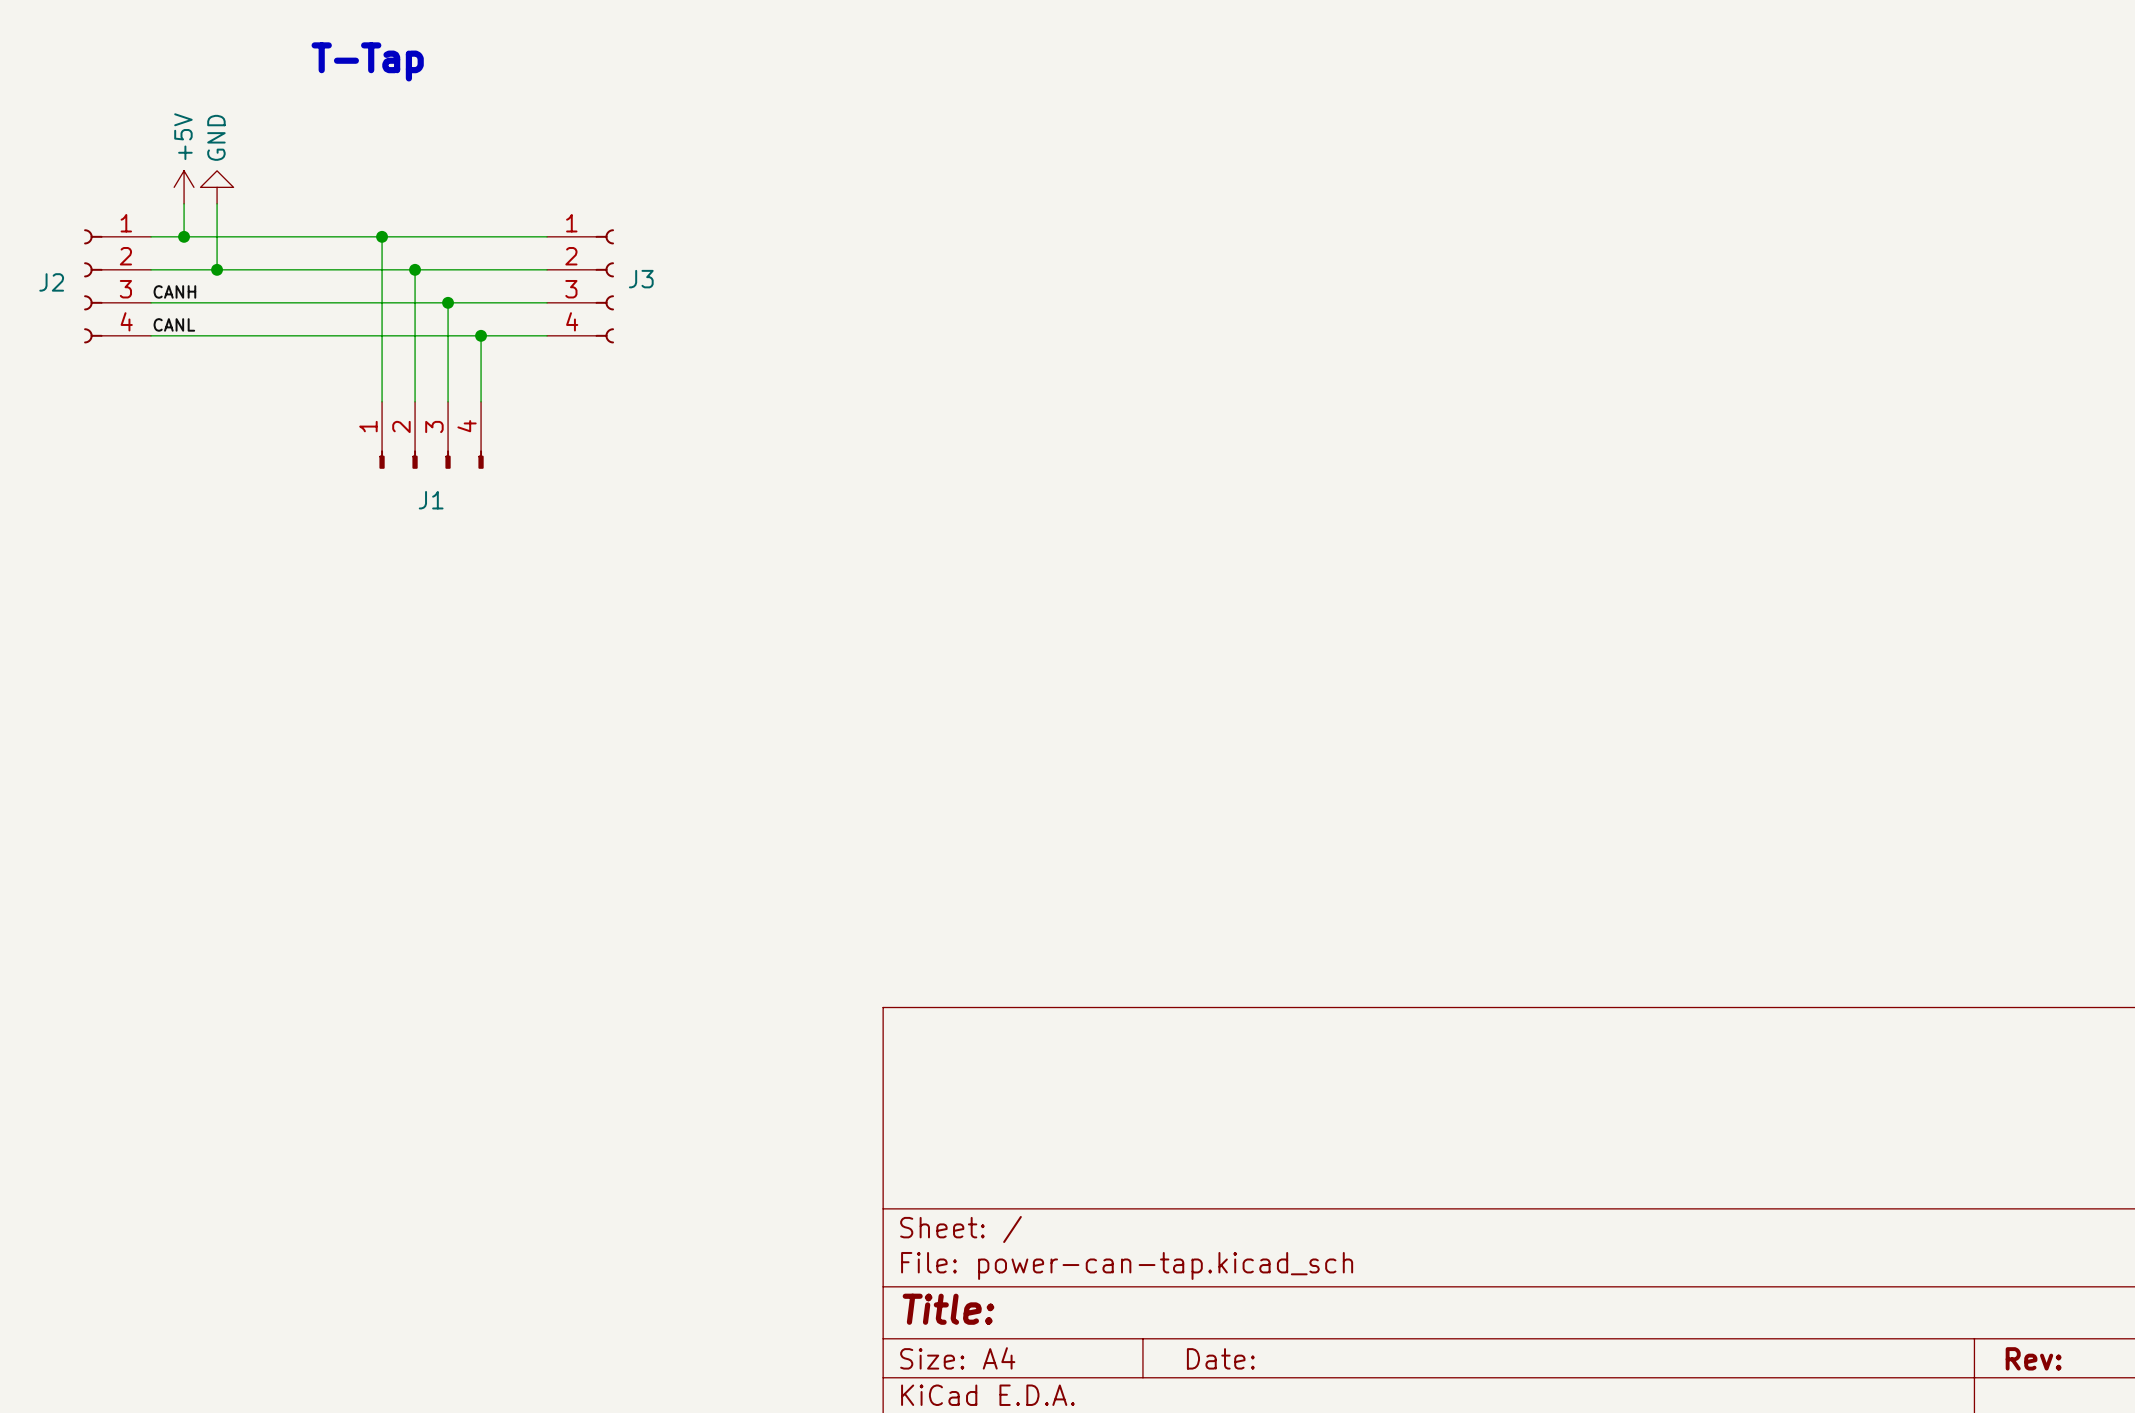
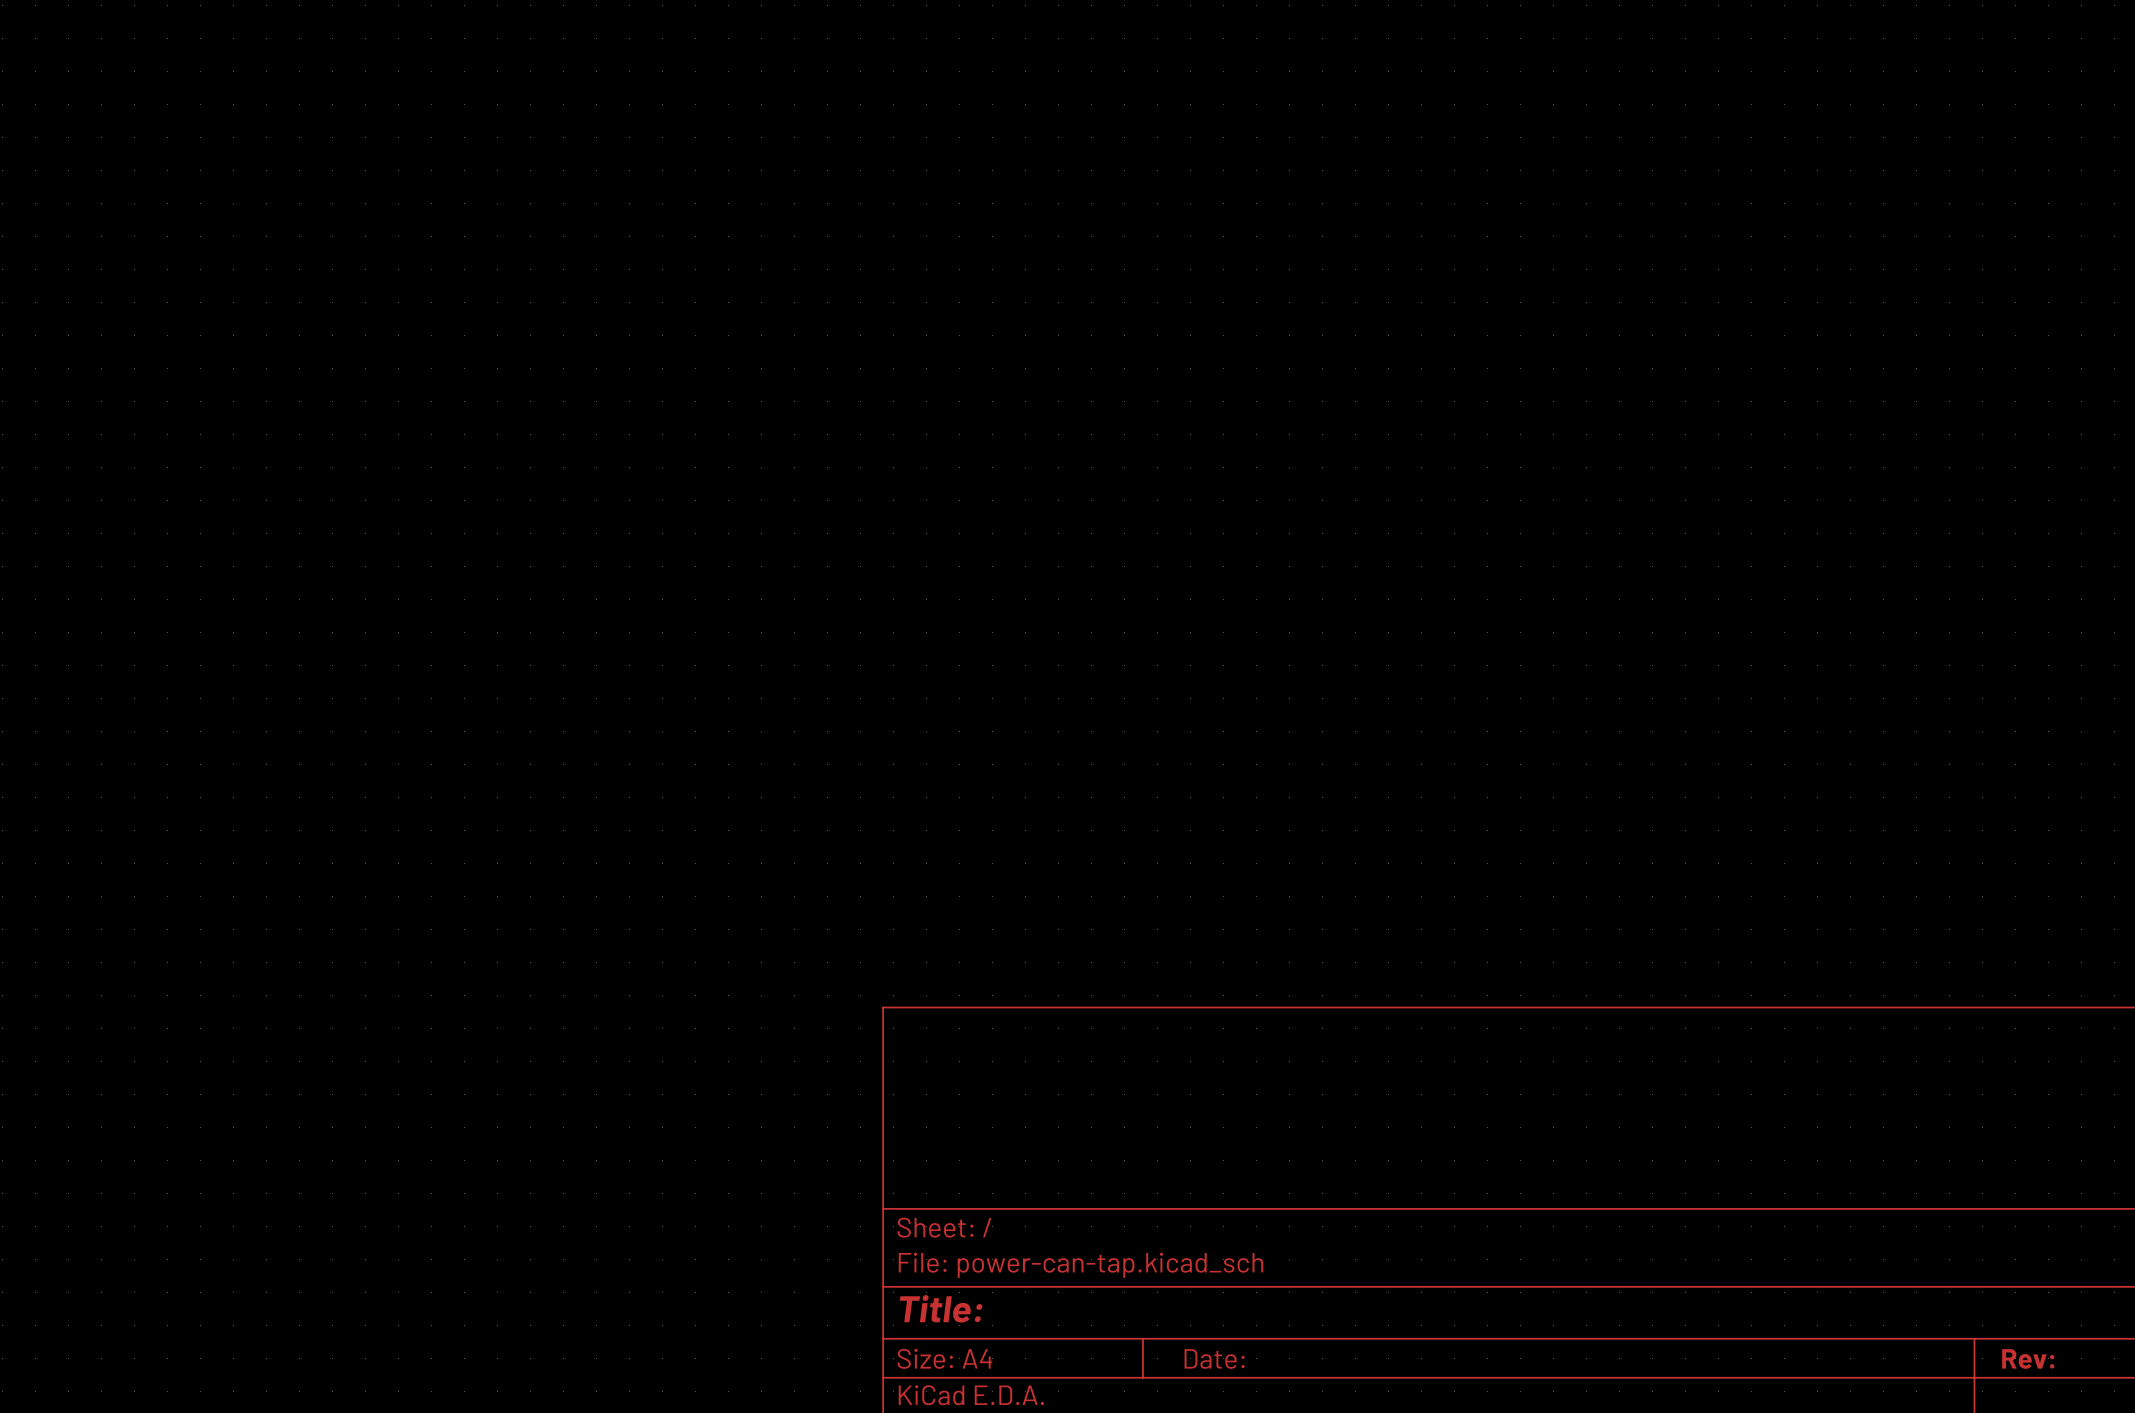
text: T-Tap (367, 61) -> none
power symbol: +5V (184, 187) -> none
power symbol: GND (217, 187) -> none
wire: (184, 203) (184, 236) -> none
wire: (217, 203) (217, 269) -> none
wire: (151, 236) (547, 236) -> none
junction: (184, 236) -> none
wire: (382, 236) (382, 401) -> none
junction: (382, 236) -> none
wire: (151, 269) (547, 269) -> none
junction: (217, 269) -> none
wire: (415, 269) (415, 401) -> none
junction: (415, 269) -> none
J2: (117, 286) -> none
J3: (580, 286) -> none
label: CANH (174, 291) -> none
wire: (151, 302) (547, 302) -> none
wire: (448, 302) (448, 401) -> none
junction: (448, 302) -> none
label: CANL (174, 324) -> none
wire: (151, 335) (547, 335) -> none
wire: (481, 335) (481, 401) -> none
junction: (481, 335) -> none
J1: (431, 435) -> none

